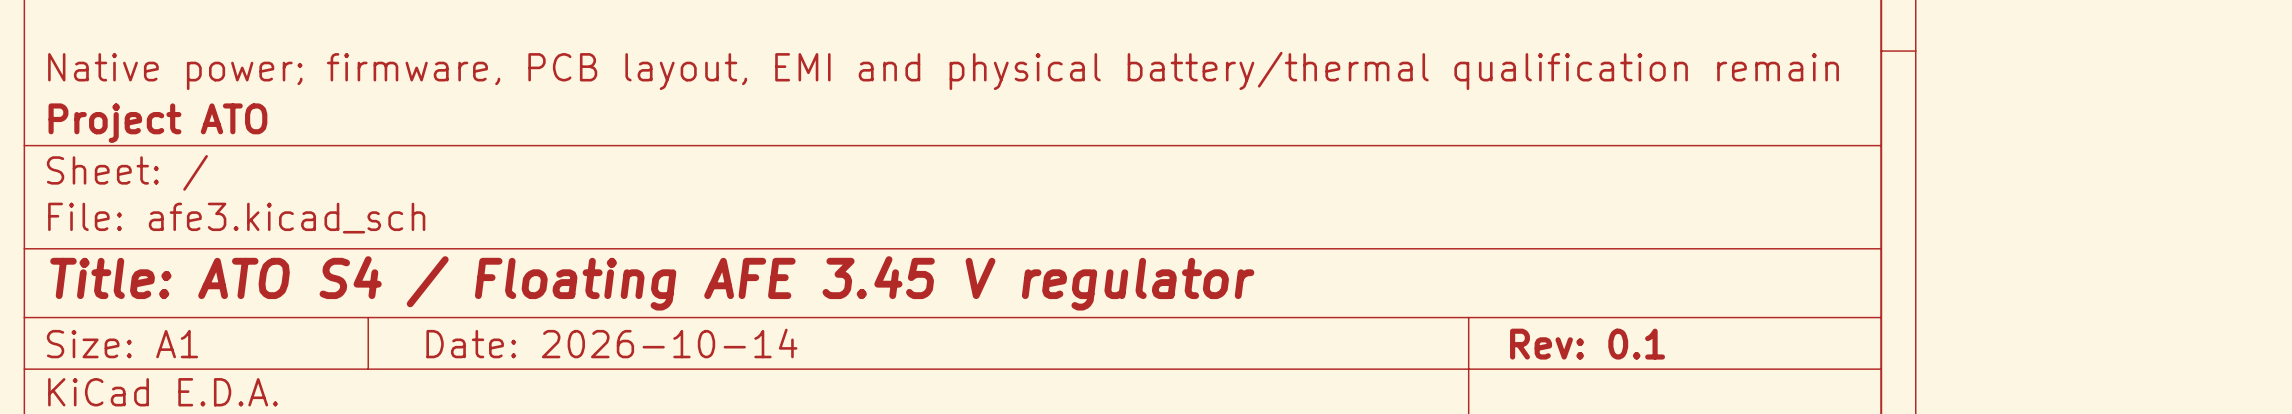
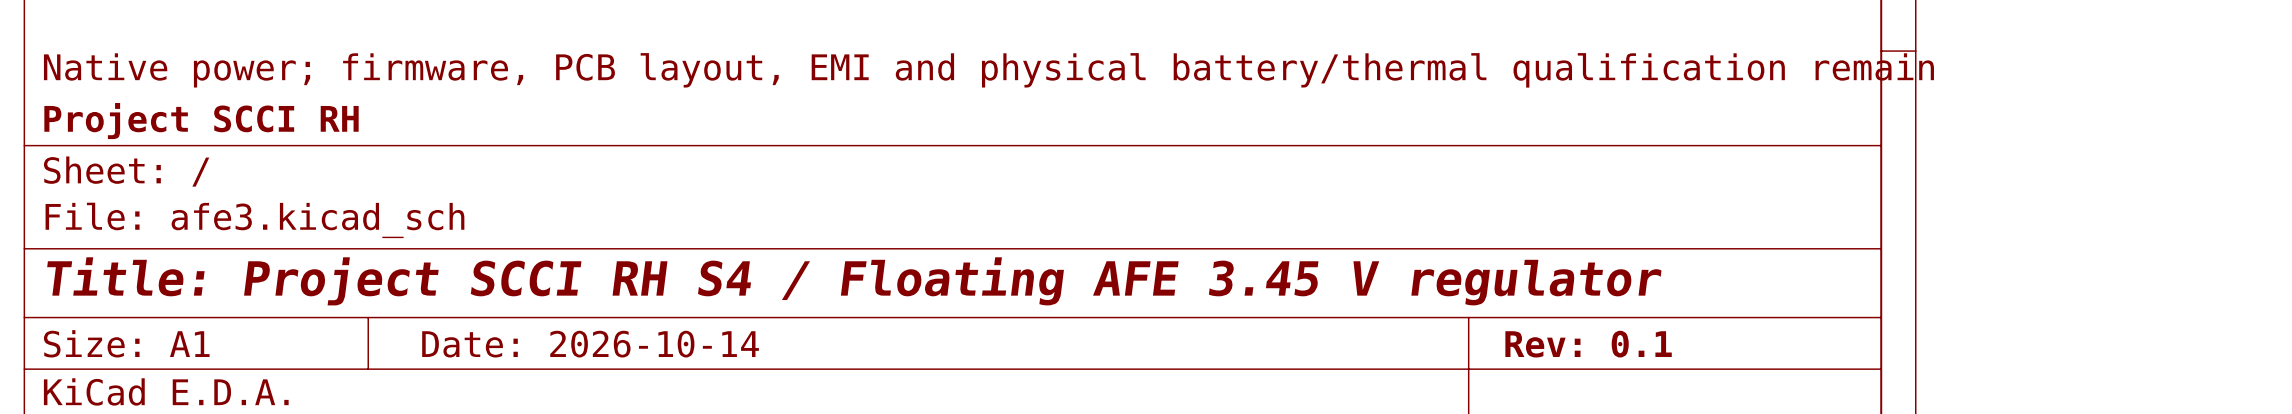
title block: Project ATO (157, 123) -> Project SCCI RH (201, 121)
title block: Title: ATO S4 / Floating AFE 3.45 V regulator (652, 283) -> Title: Project SCCI RH S4 / Floating AFE 3.45 V regulator (854, 281)

